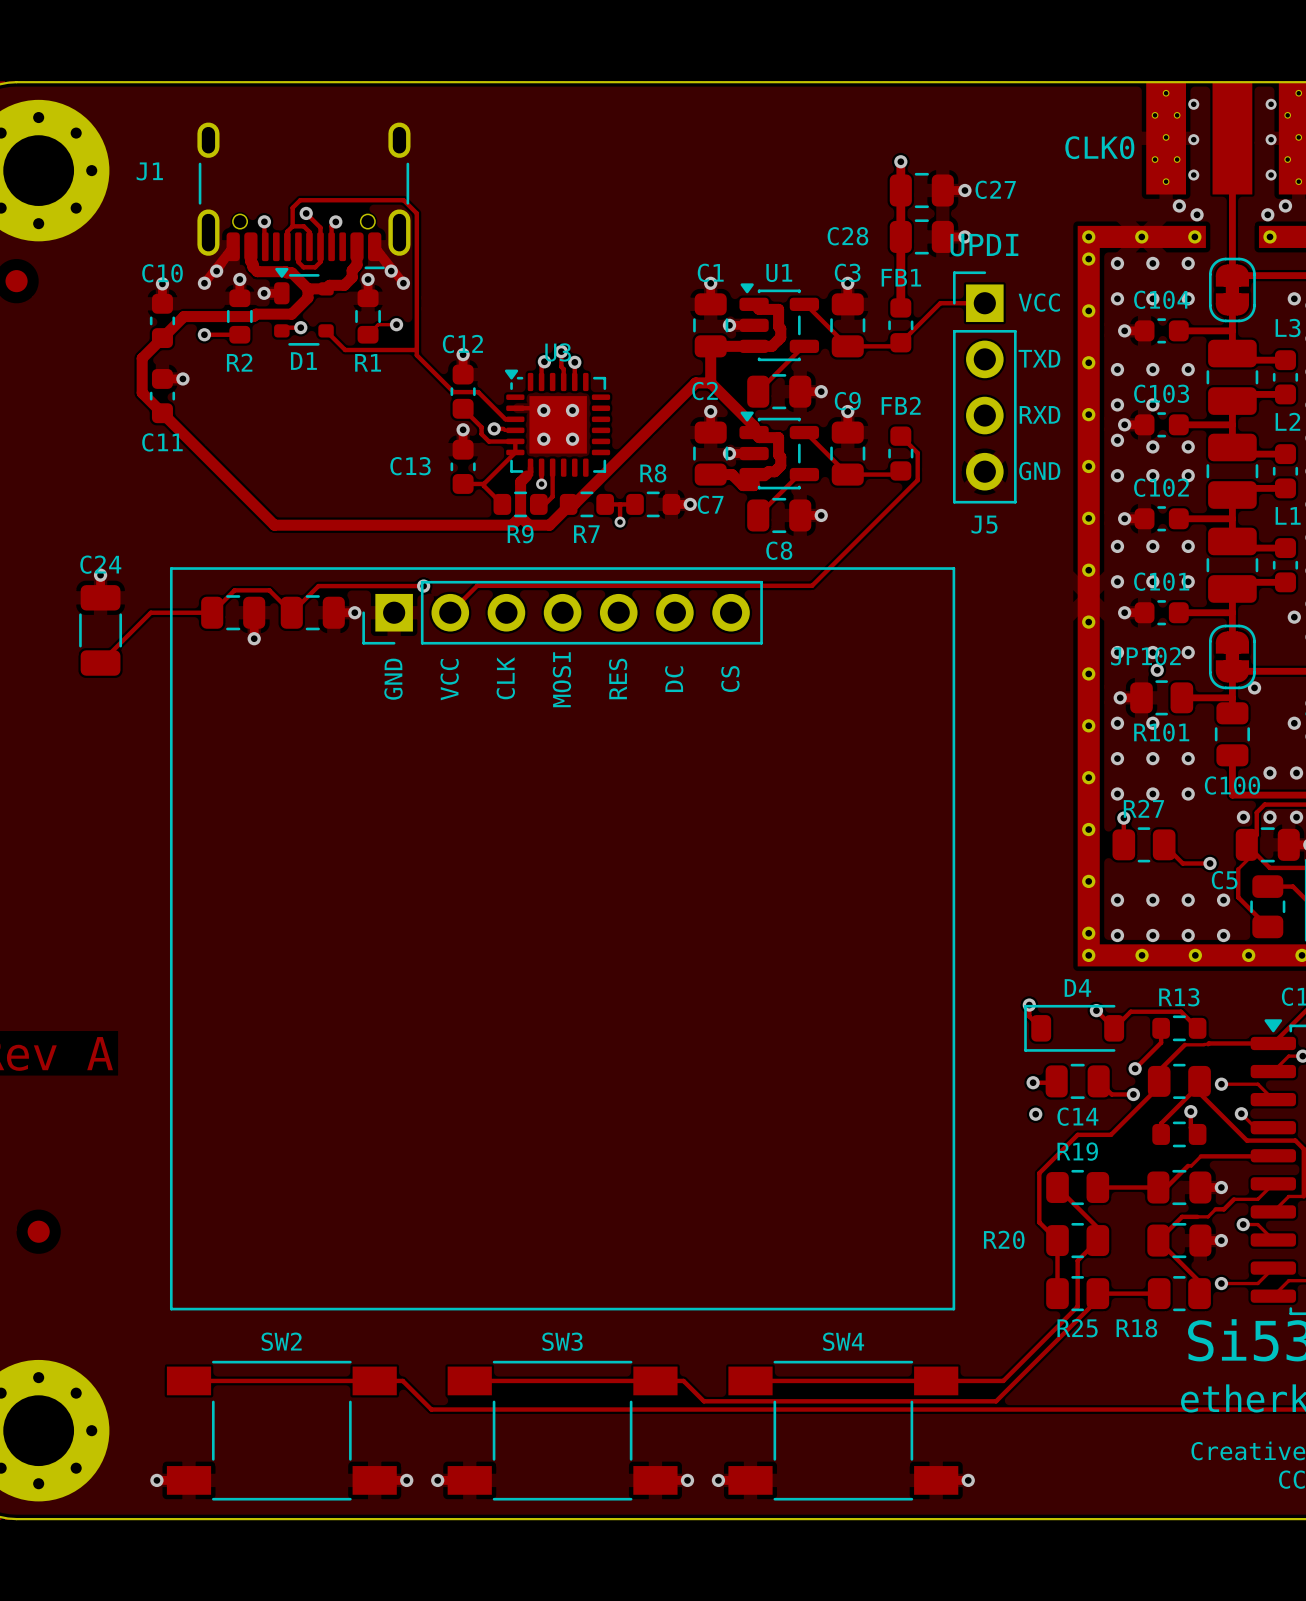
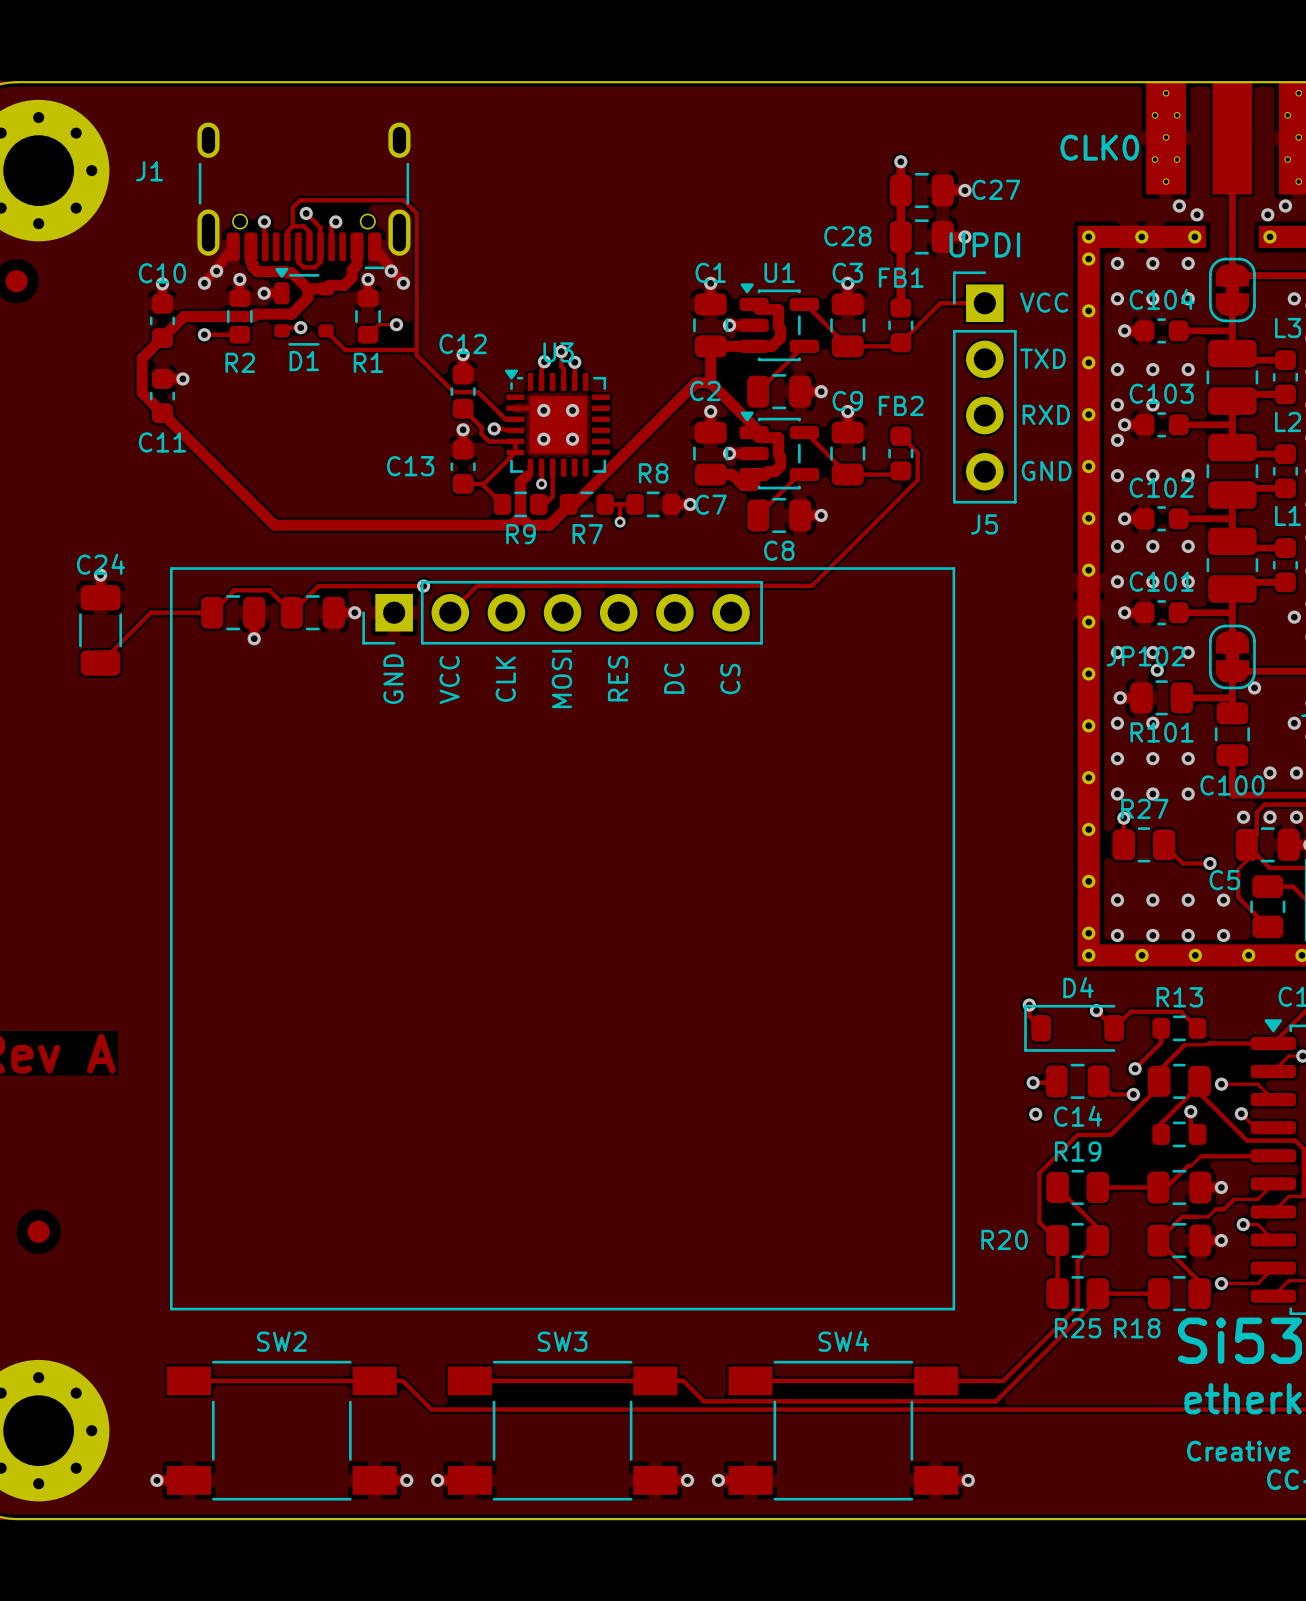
via: (1193, 104) -> none
via: (1271, 104) -> none
via: (1193, 139) -> none
via: (1271, 139) -> none
via: (1193, 175) -> none
via: (1271, 175) -> none
via: (1152, 446) -> none
via: (1188, 446) -> none

